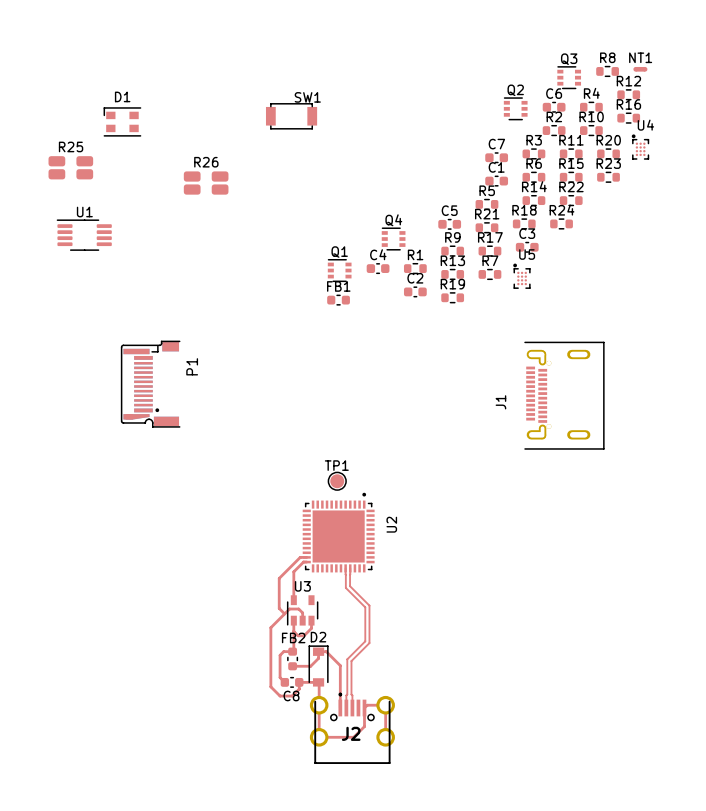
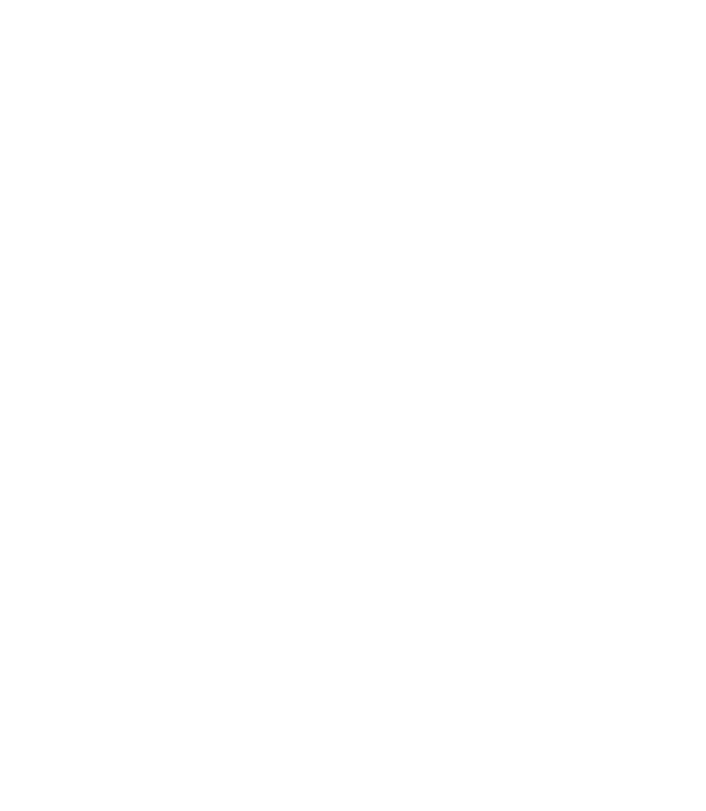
NT1: (640, 69) -> none
R8: (607, 71) -> none
Q3: (569, 77) -> none
R12: (628, 94) -> none
C6: (554, 107) -> none
R4: (591, 107) -> none
Q2: (515, 108) -> none
SW1: (291, 116) -> none
R16: (628, 118) -> none
D1: (122, 121) -> none
R2: (554, 130) -> none
R10: (591, 130) -> none
U4: (640, 147) -> none
R3: (533, 153) -> none
R11: (571, 153) -> none
R20: (608, 153) -> none
C7: (496, 157) -> none
R25: (70, 167) -> none
R6: (533, 177) -> none
R15: (571, 177) -> none
R23: (608, 177) -> none
C1: (496, 181) -> none
R26: (206, 183) -> none
R14: (533, 200) -> none
R22: (571, 200) -> none
R5: (486, 204) -> none
R18: (524, 223) -> none
R24: (561, 223) -> none
C5: (449, 224) -> none
R21: (486, 227) -> none
U1: (84, 235) -> none
Q4: (393, 239) -> none
C3: (527, 247) -> none
R9: (452, 251) -> none
R17: (489, 251) -> none
C4: (378, 268) -> none
R1: (415, 268) -> none
Q1: (339, 270) -> none
R13: (452, 274) -> none
R7: (489, 274) -> none
U5: (521, 276) -> none
C2: (415, 291) -> none
R19: (452, 297) -> none
FB1: (338, 300) -> none
P1: (150, 384) -> none
J1: (564, 395) -> none
TP1: (337, 481) -> none
U2: (338, 532) -> none
top track: (306, 557) (300, 557) (279, 578) (279, 608) (284, 613) -> none
top track: (306, 562) (303, 562) (293, 571) (293, 600) -> none
top track: (345, 568) (345, 587) (365, 607) (365, 641) (347, 659) (346, 708) -> none
top track: (350, 568) (350, 586) (369, 605) (369, 643) (351, 661) (352, 708) -> none
U3: (302, 610) -> none
top track: (293, 620) (293, 650) (283, 651) (280, 655) (280, 677) (284, 682) -> none
top track: (302, 620) (302, 612) (298, 609) (289, 609) (270, 627) (270, 686) (280, 696) (292, 696) (299, 689) (299, 682) (319, 682) (319, 737) (353, 737) (364, 726) (364, 708) (367, 705) (385, 705) (385, 737) -> none
top track: (311, 620) (311, 628) (304, 635) (298, 635) (293, 631) -> none
FB2: (292, 658) -> none
top track: (292, 666) (310, 666) (318, 658) (318, 651) (326, 651) (340, 665) (340, 708) -> none
D2: (318, 666) -> none
C8: (292, 682) -> none
J2: (352, 728) -> none

